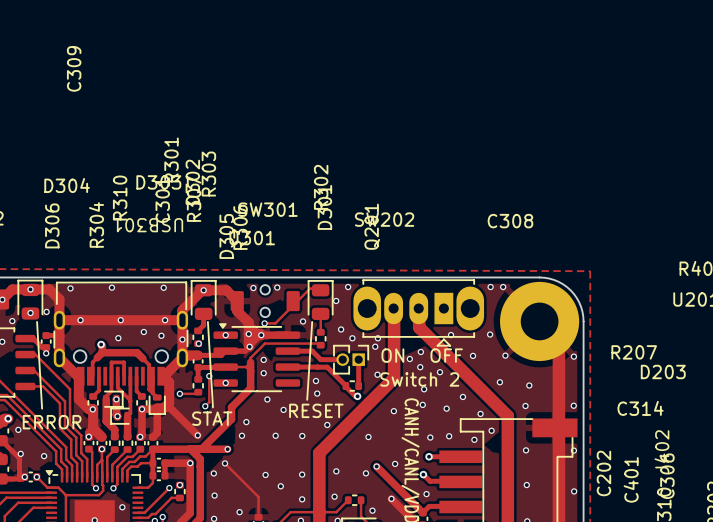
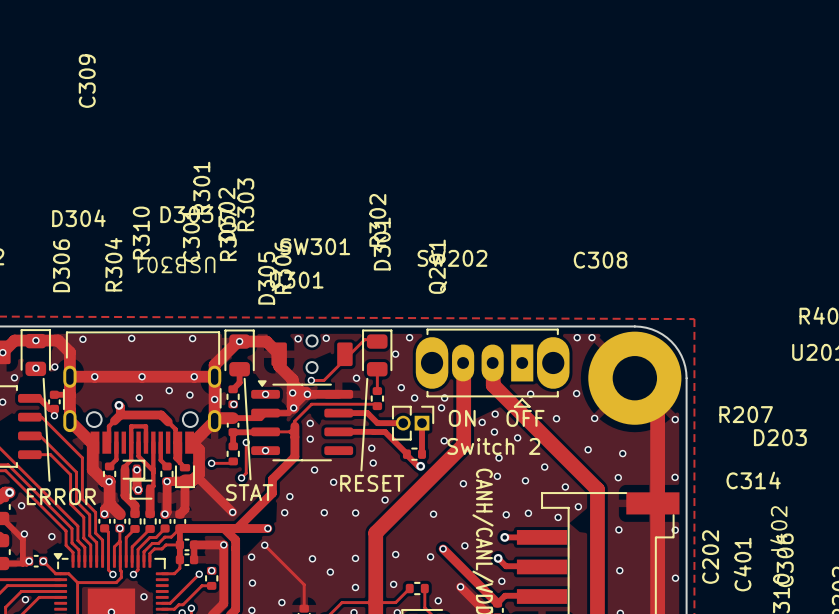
via: none -> (25, 599)

